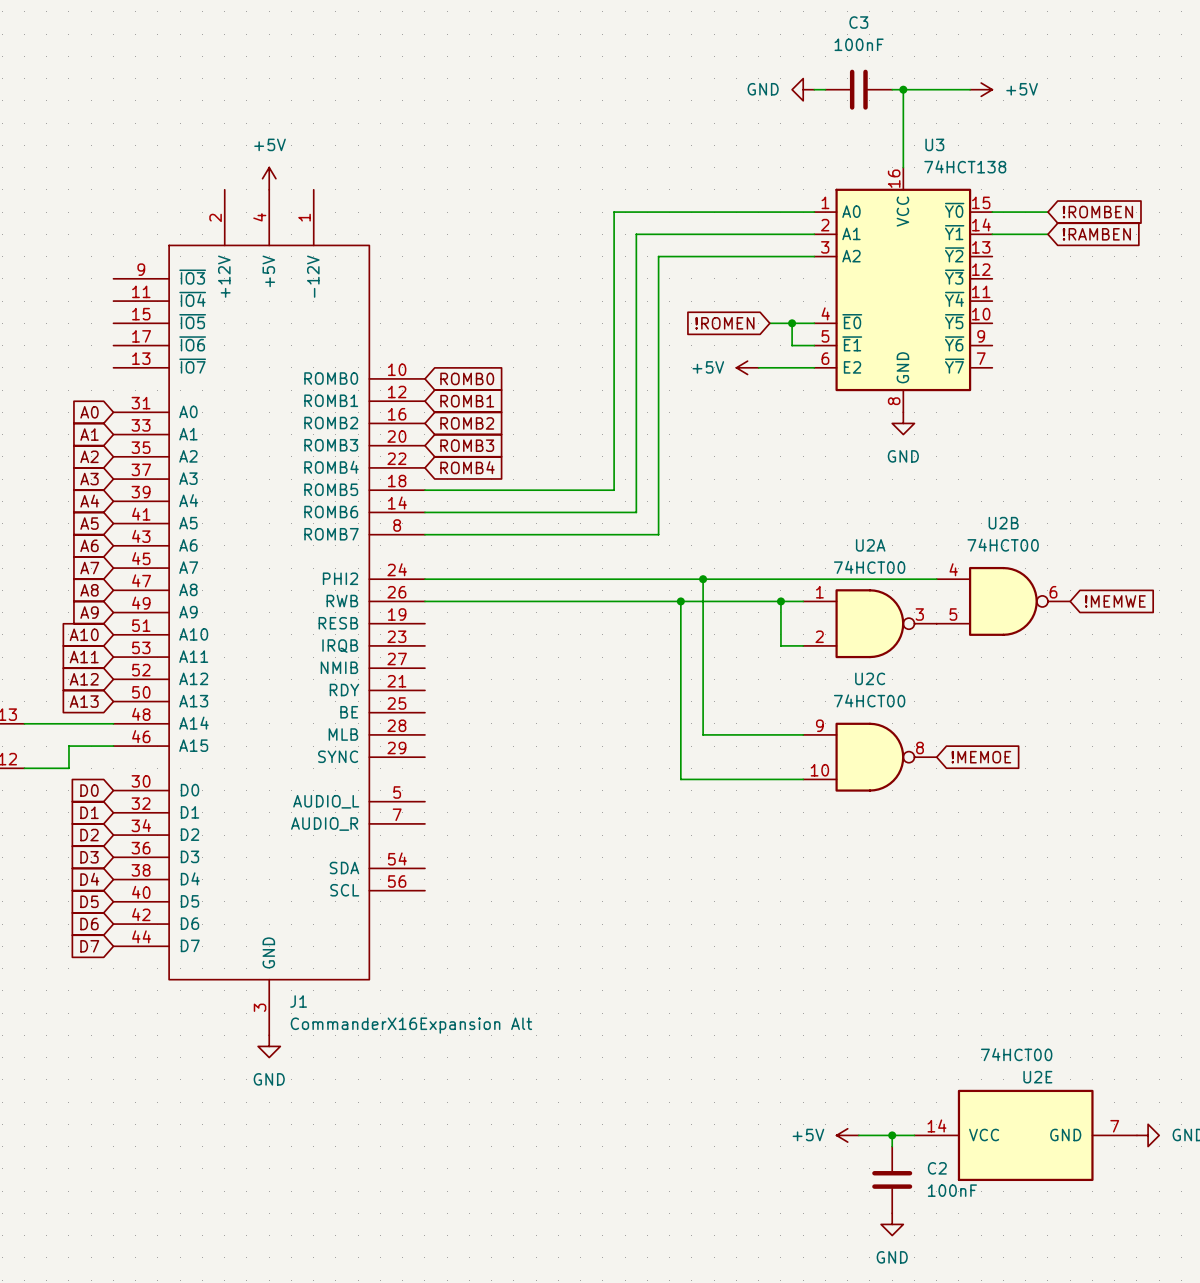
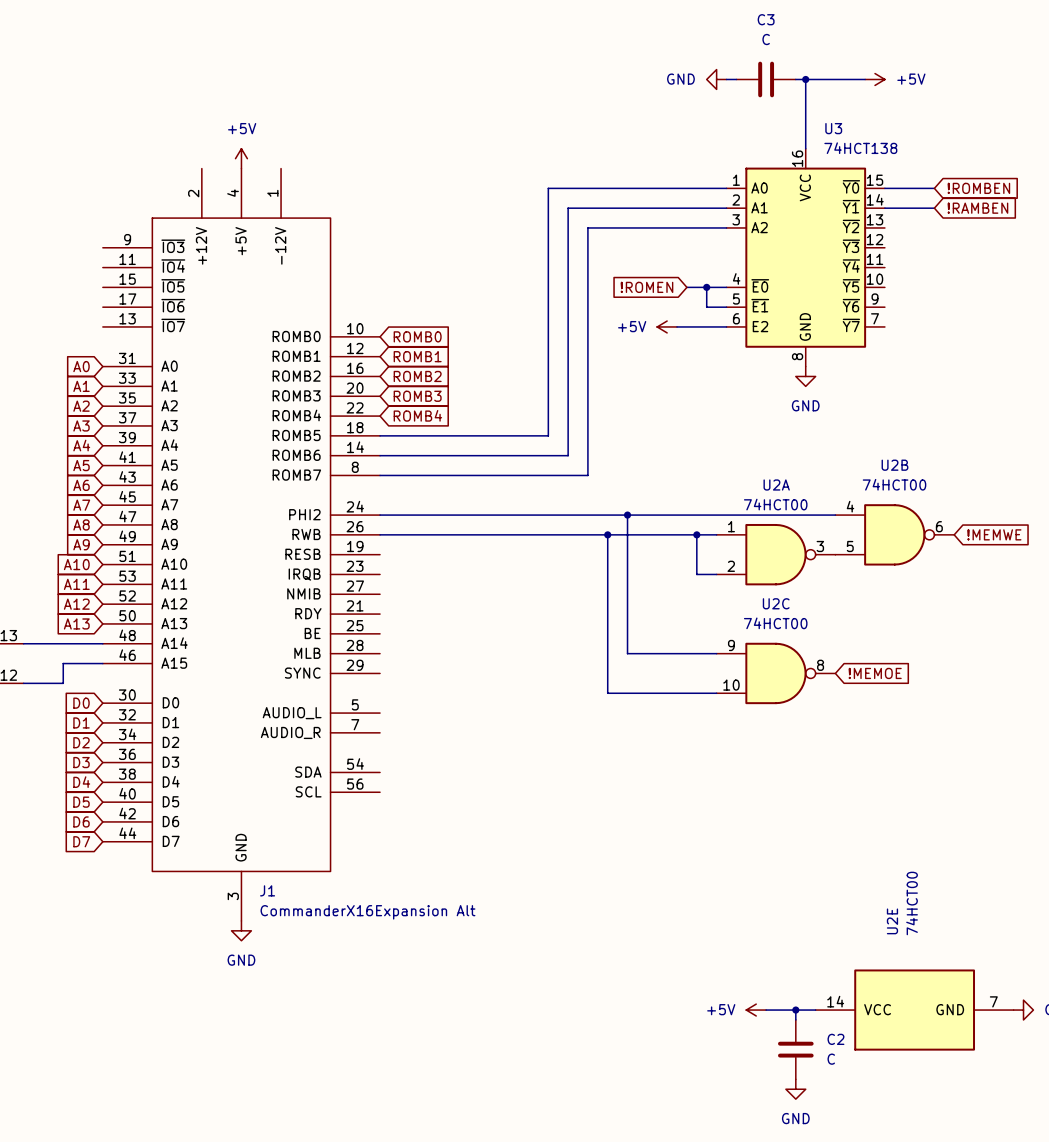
C3 value: 100nF (859, 44) -> C (766, 39)
U2E value rotation: 0° (1016, 1054) -> 90° counterclockwise (912, 903)
U2E name rotation: 0° (1037, 1077) -> 90° counterclockwise (892, 921)
U2E name position: U2E (1037, 1077) -> U2E (892, 921)
C2 value: 100nF (952, 1190) -> C (831, 1059)

